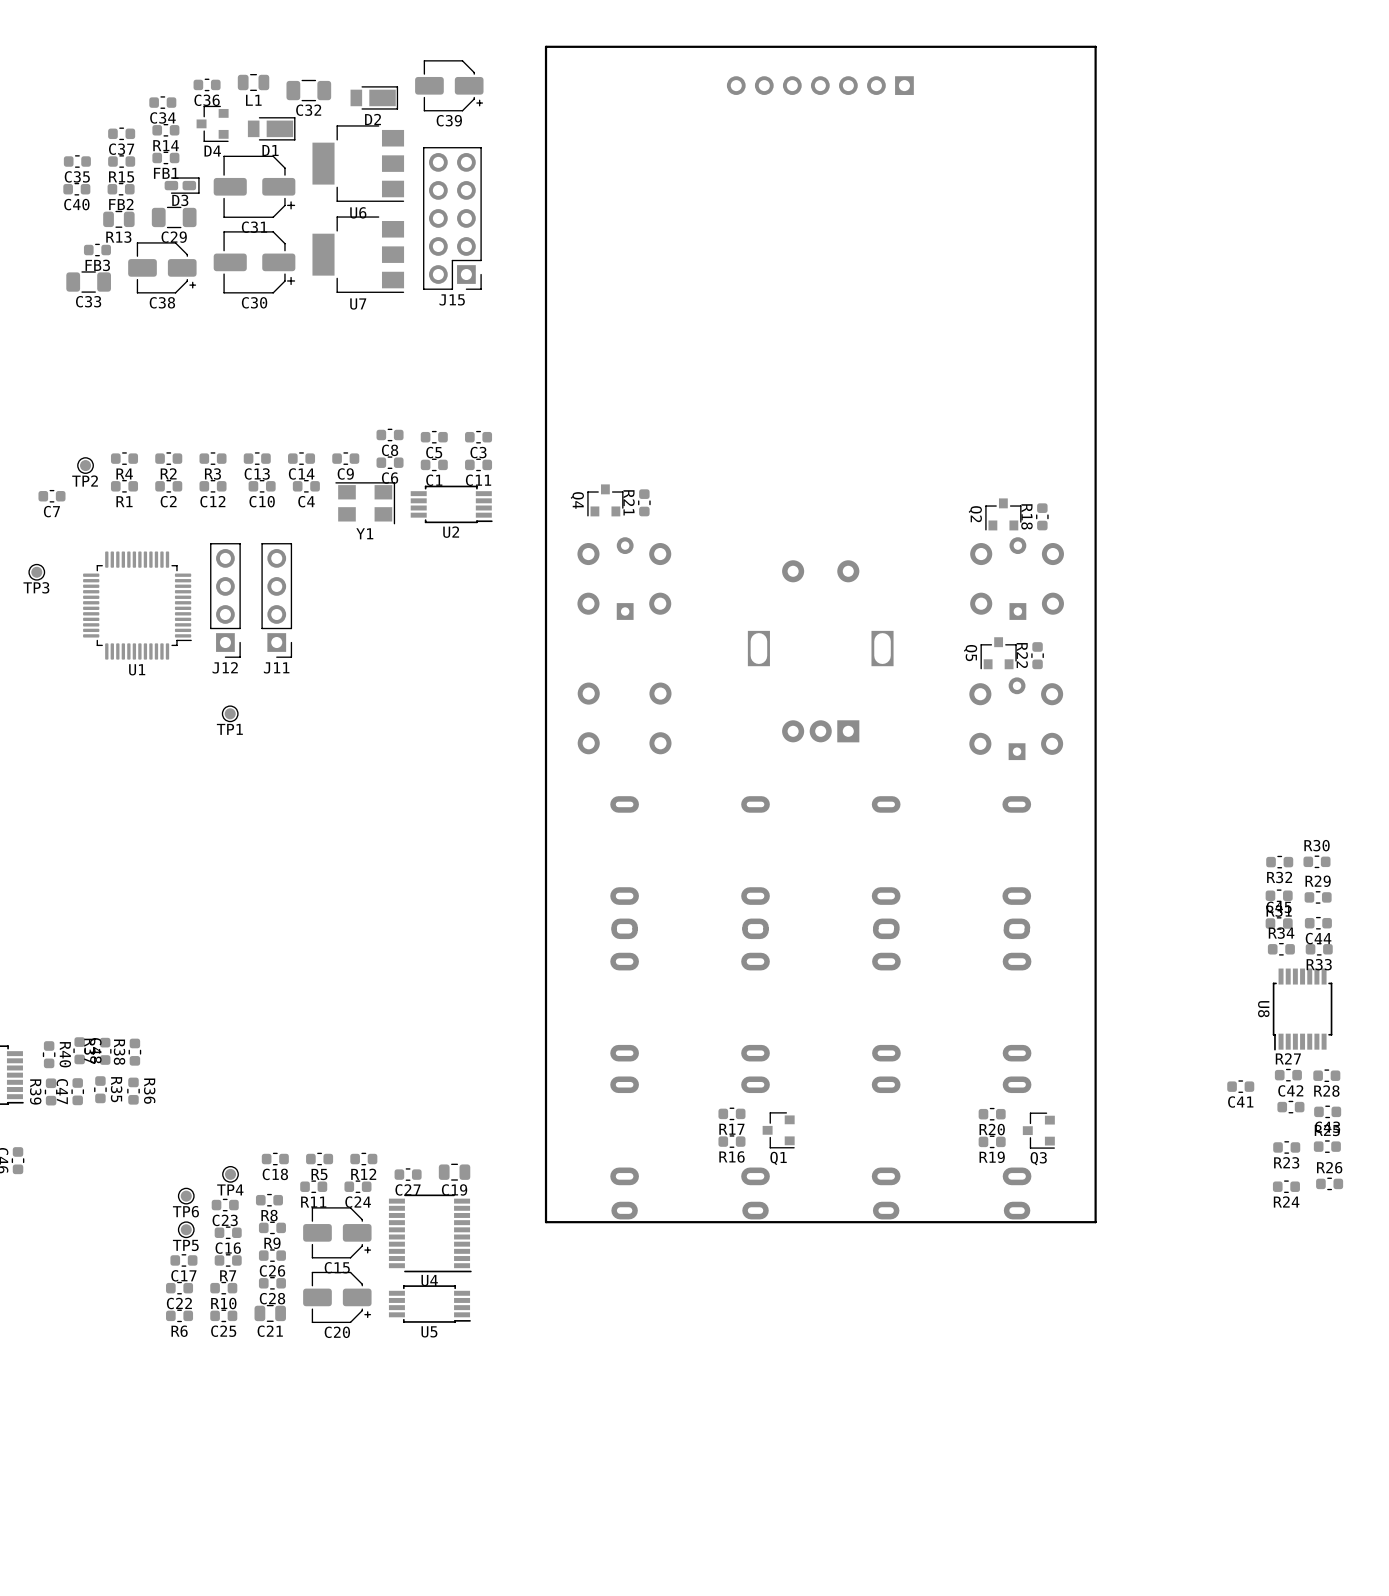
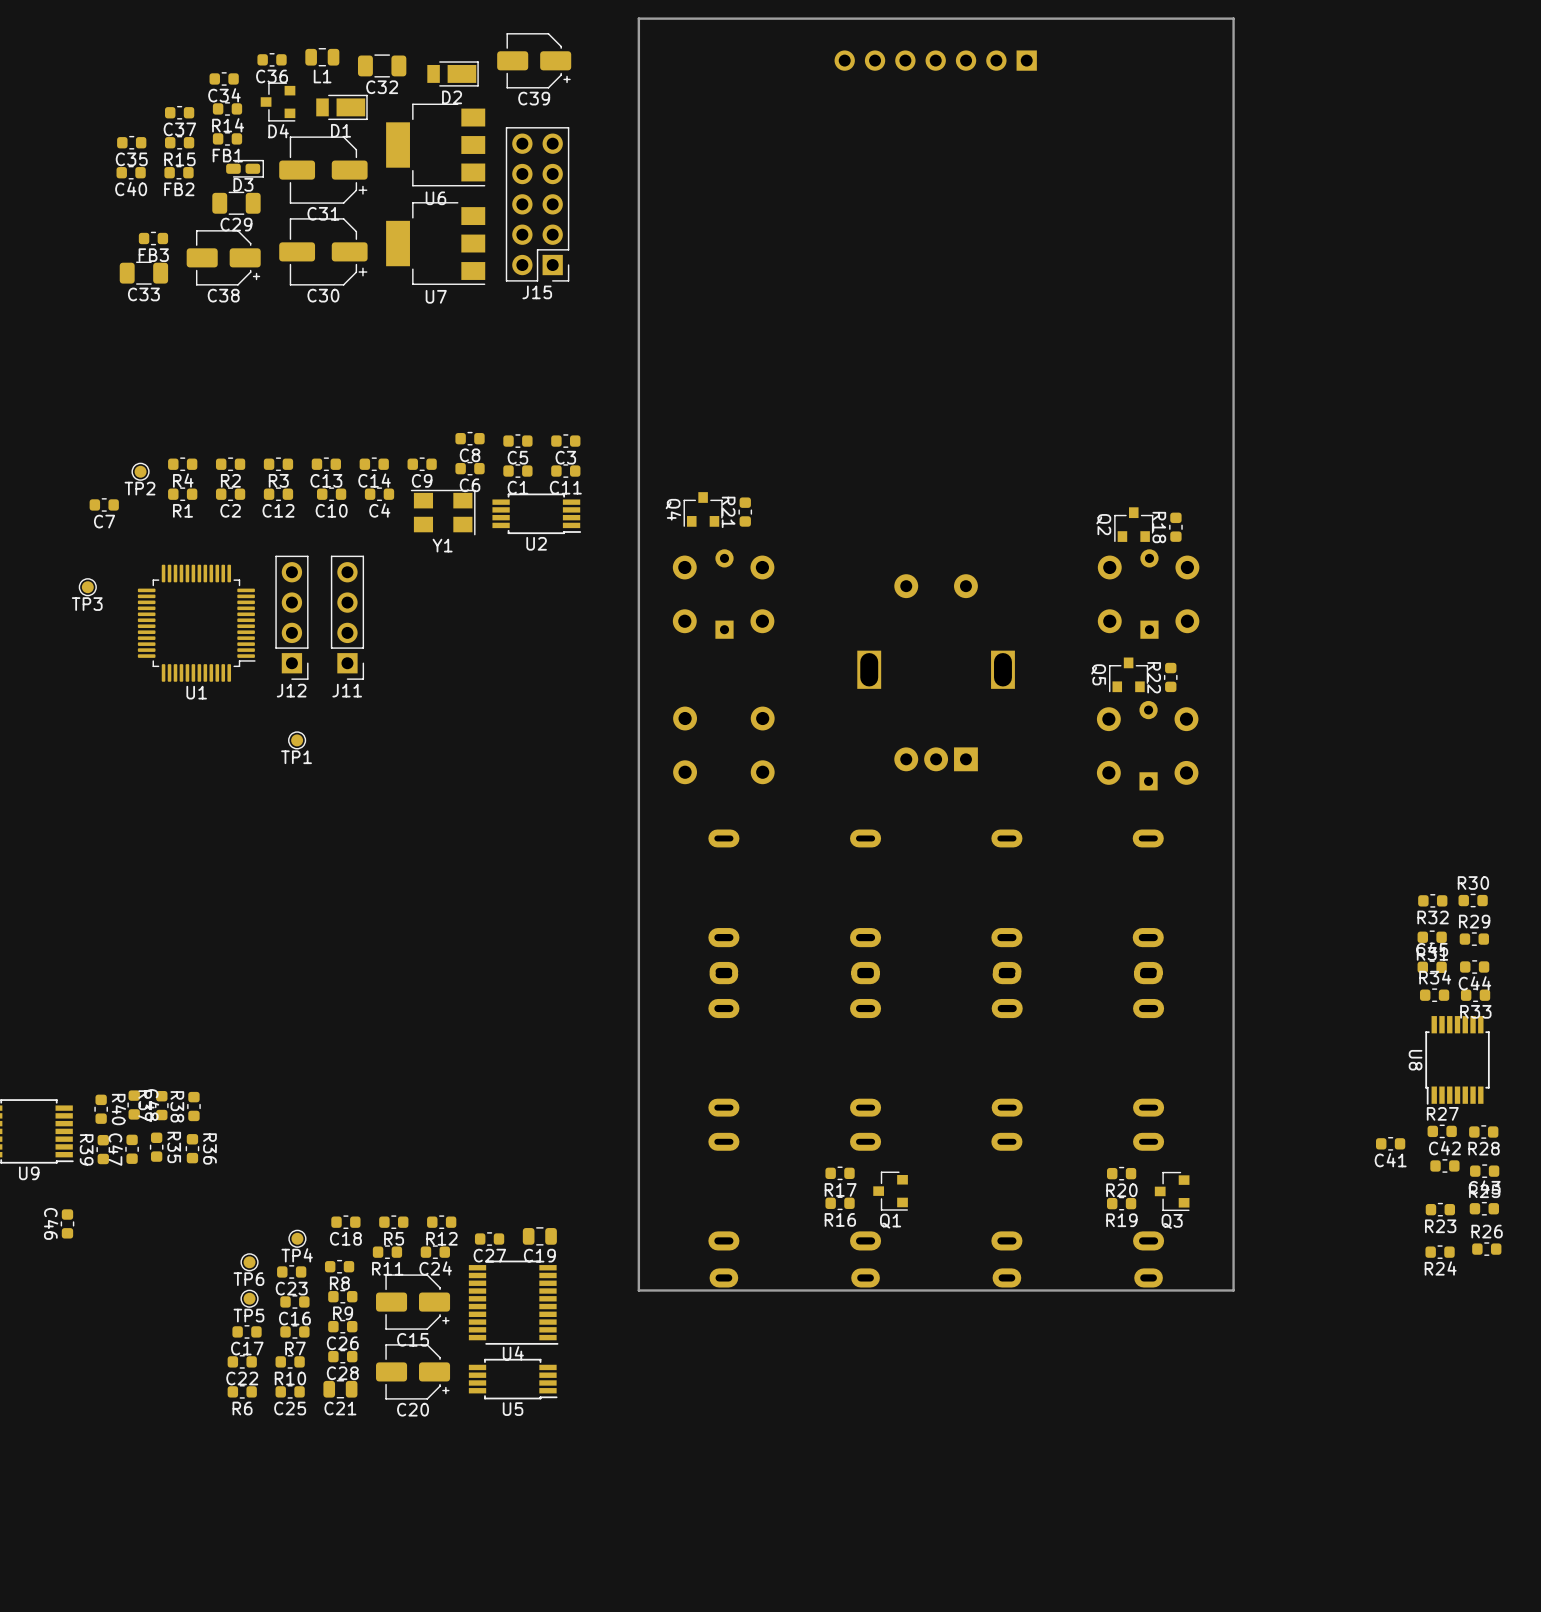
R13: (118, 219) -> none

